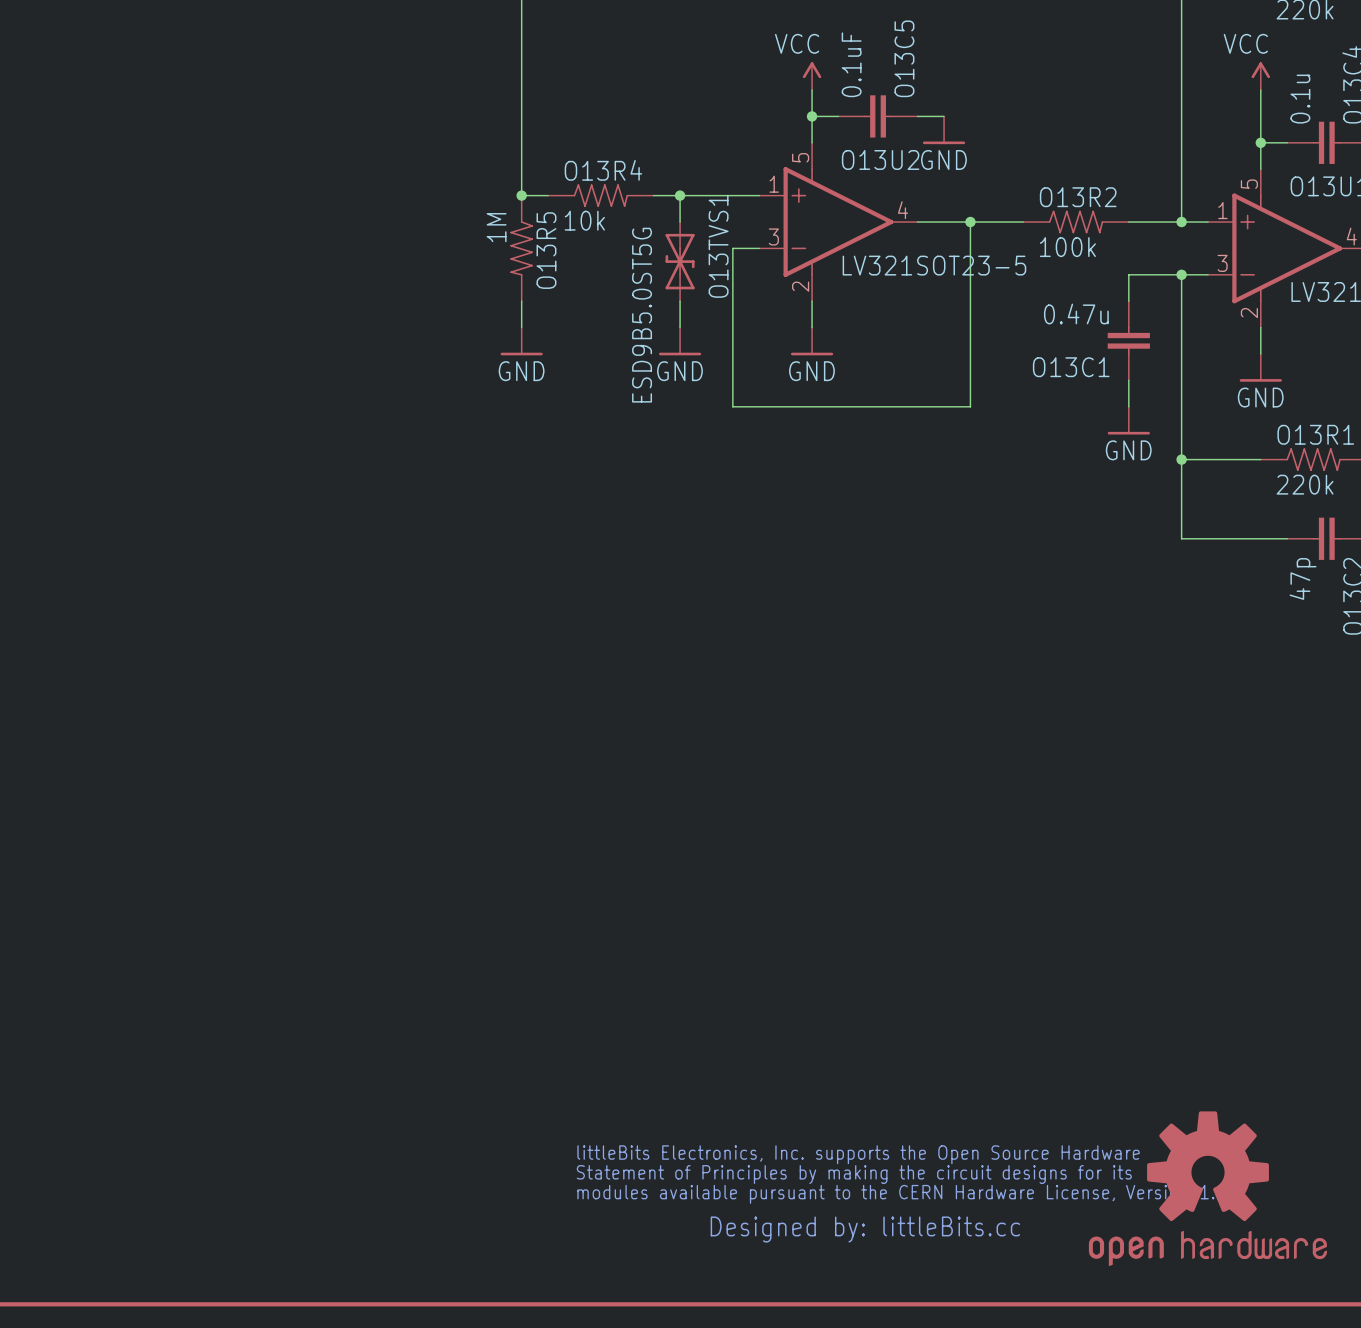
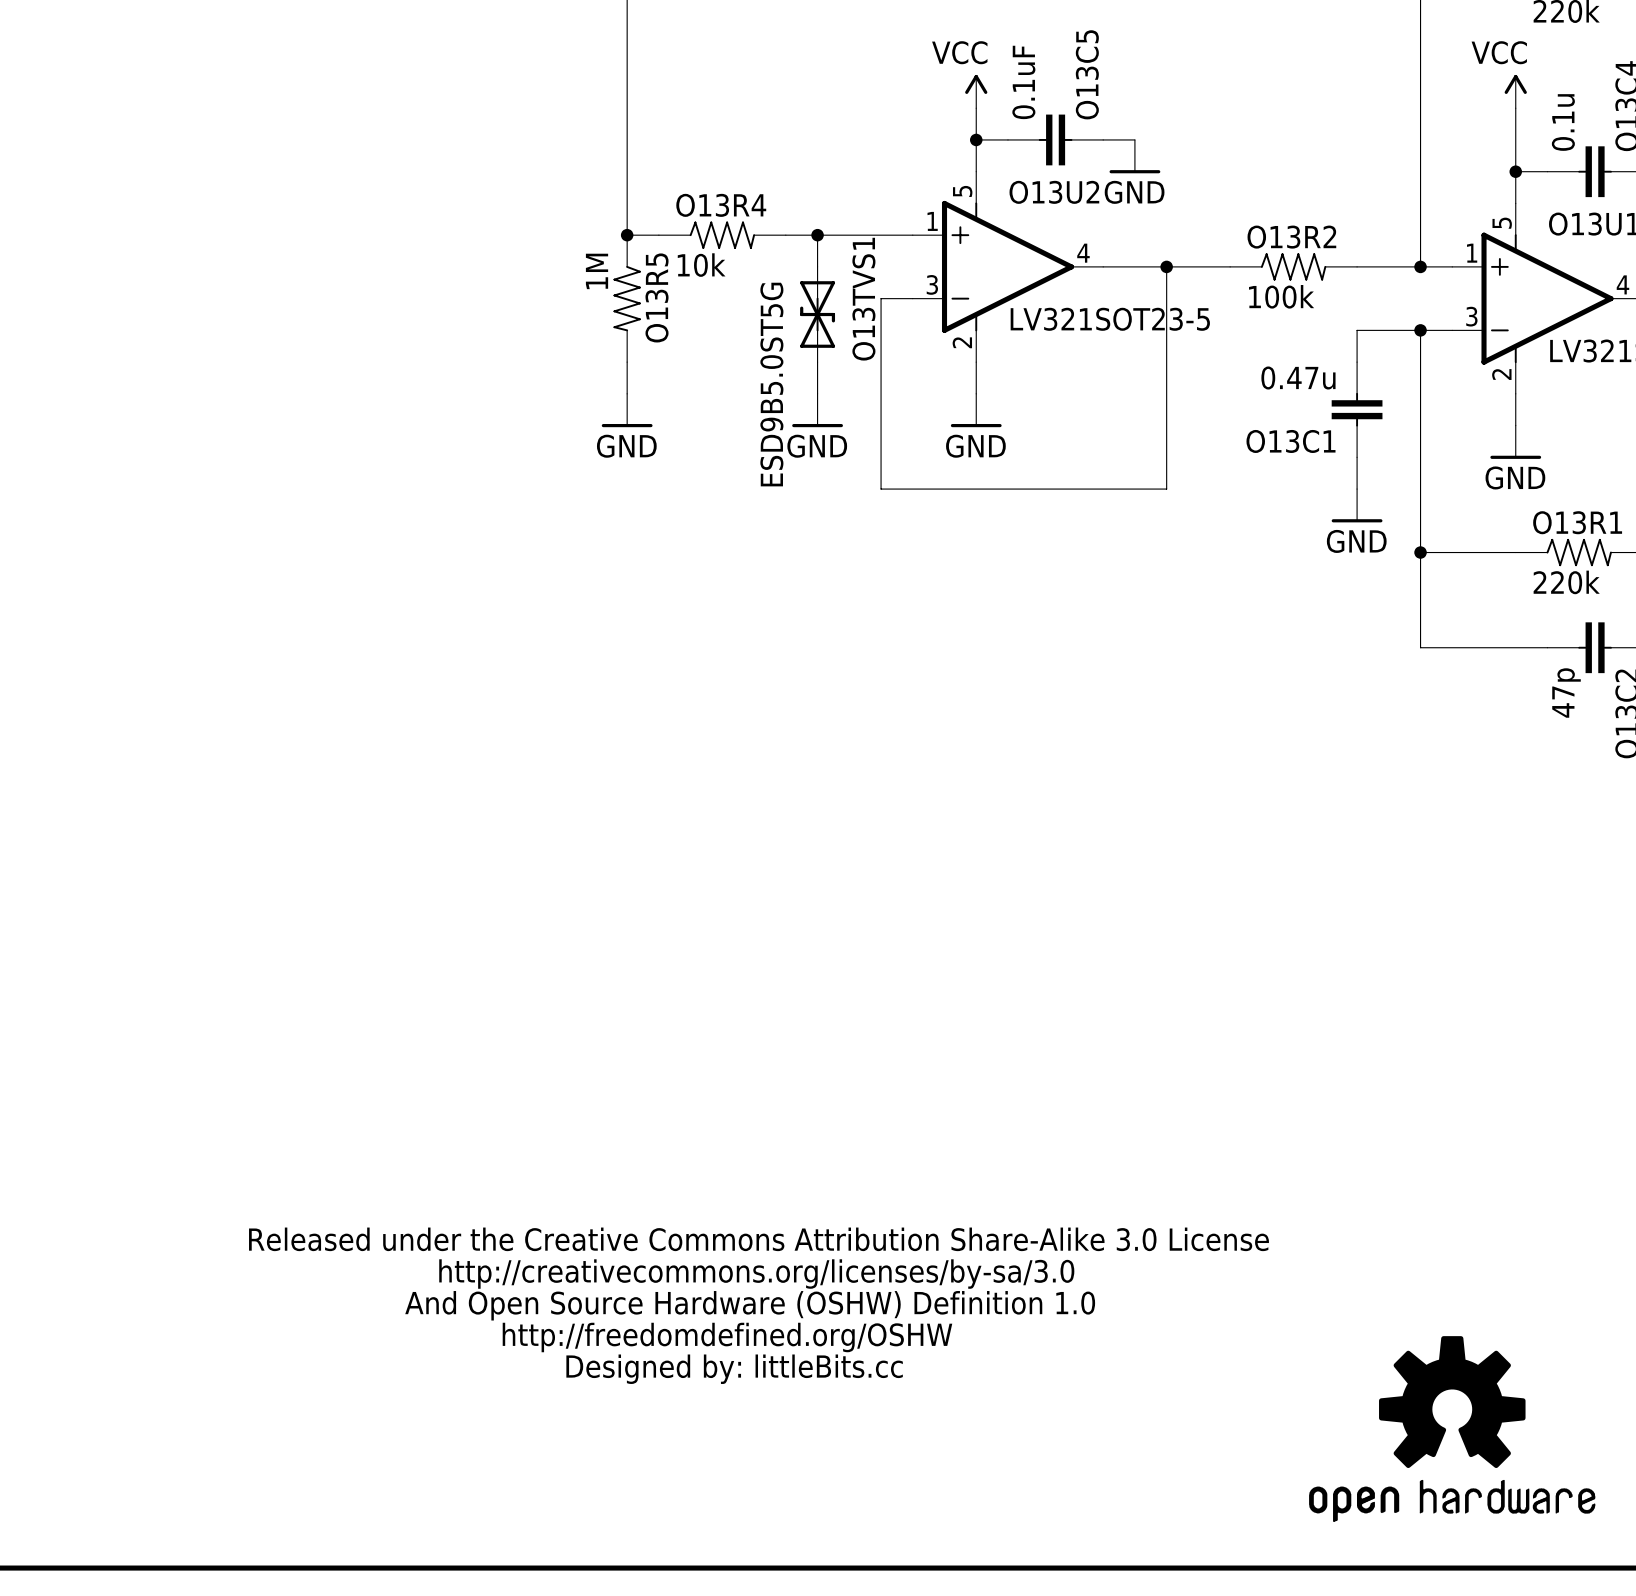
part: none -> (758, 1305)
part: (901, 1193) -> none

